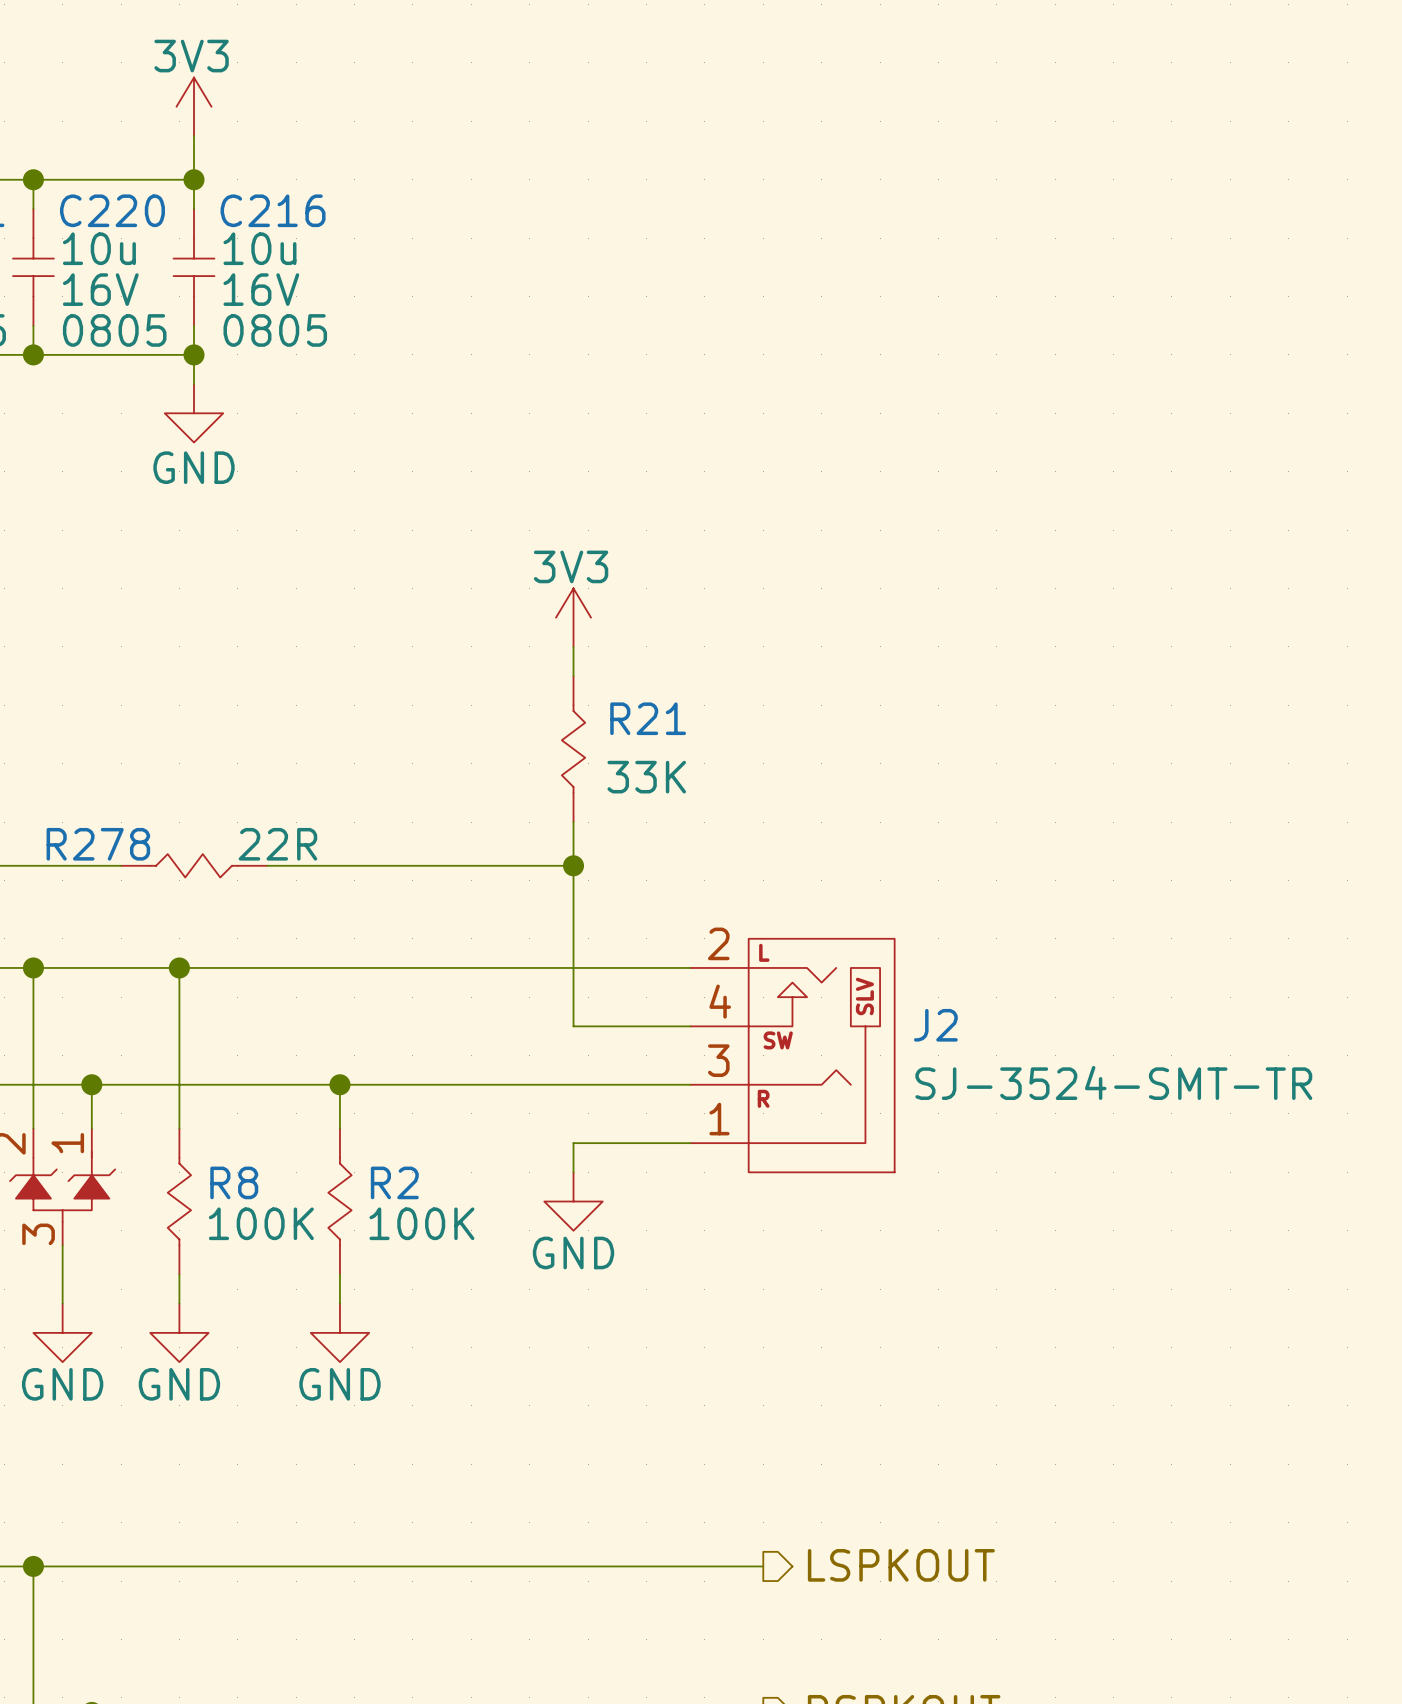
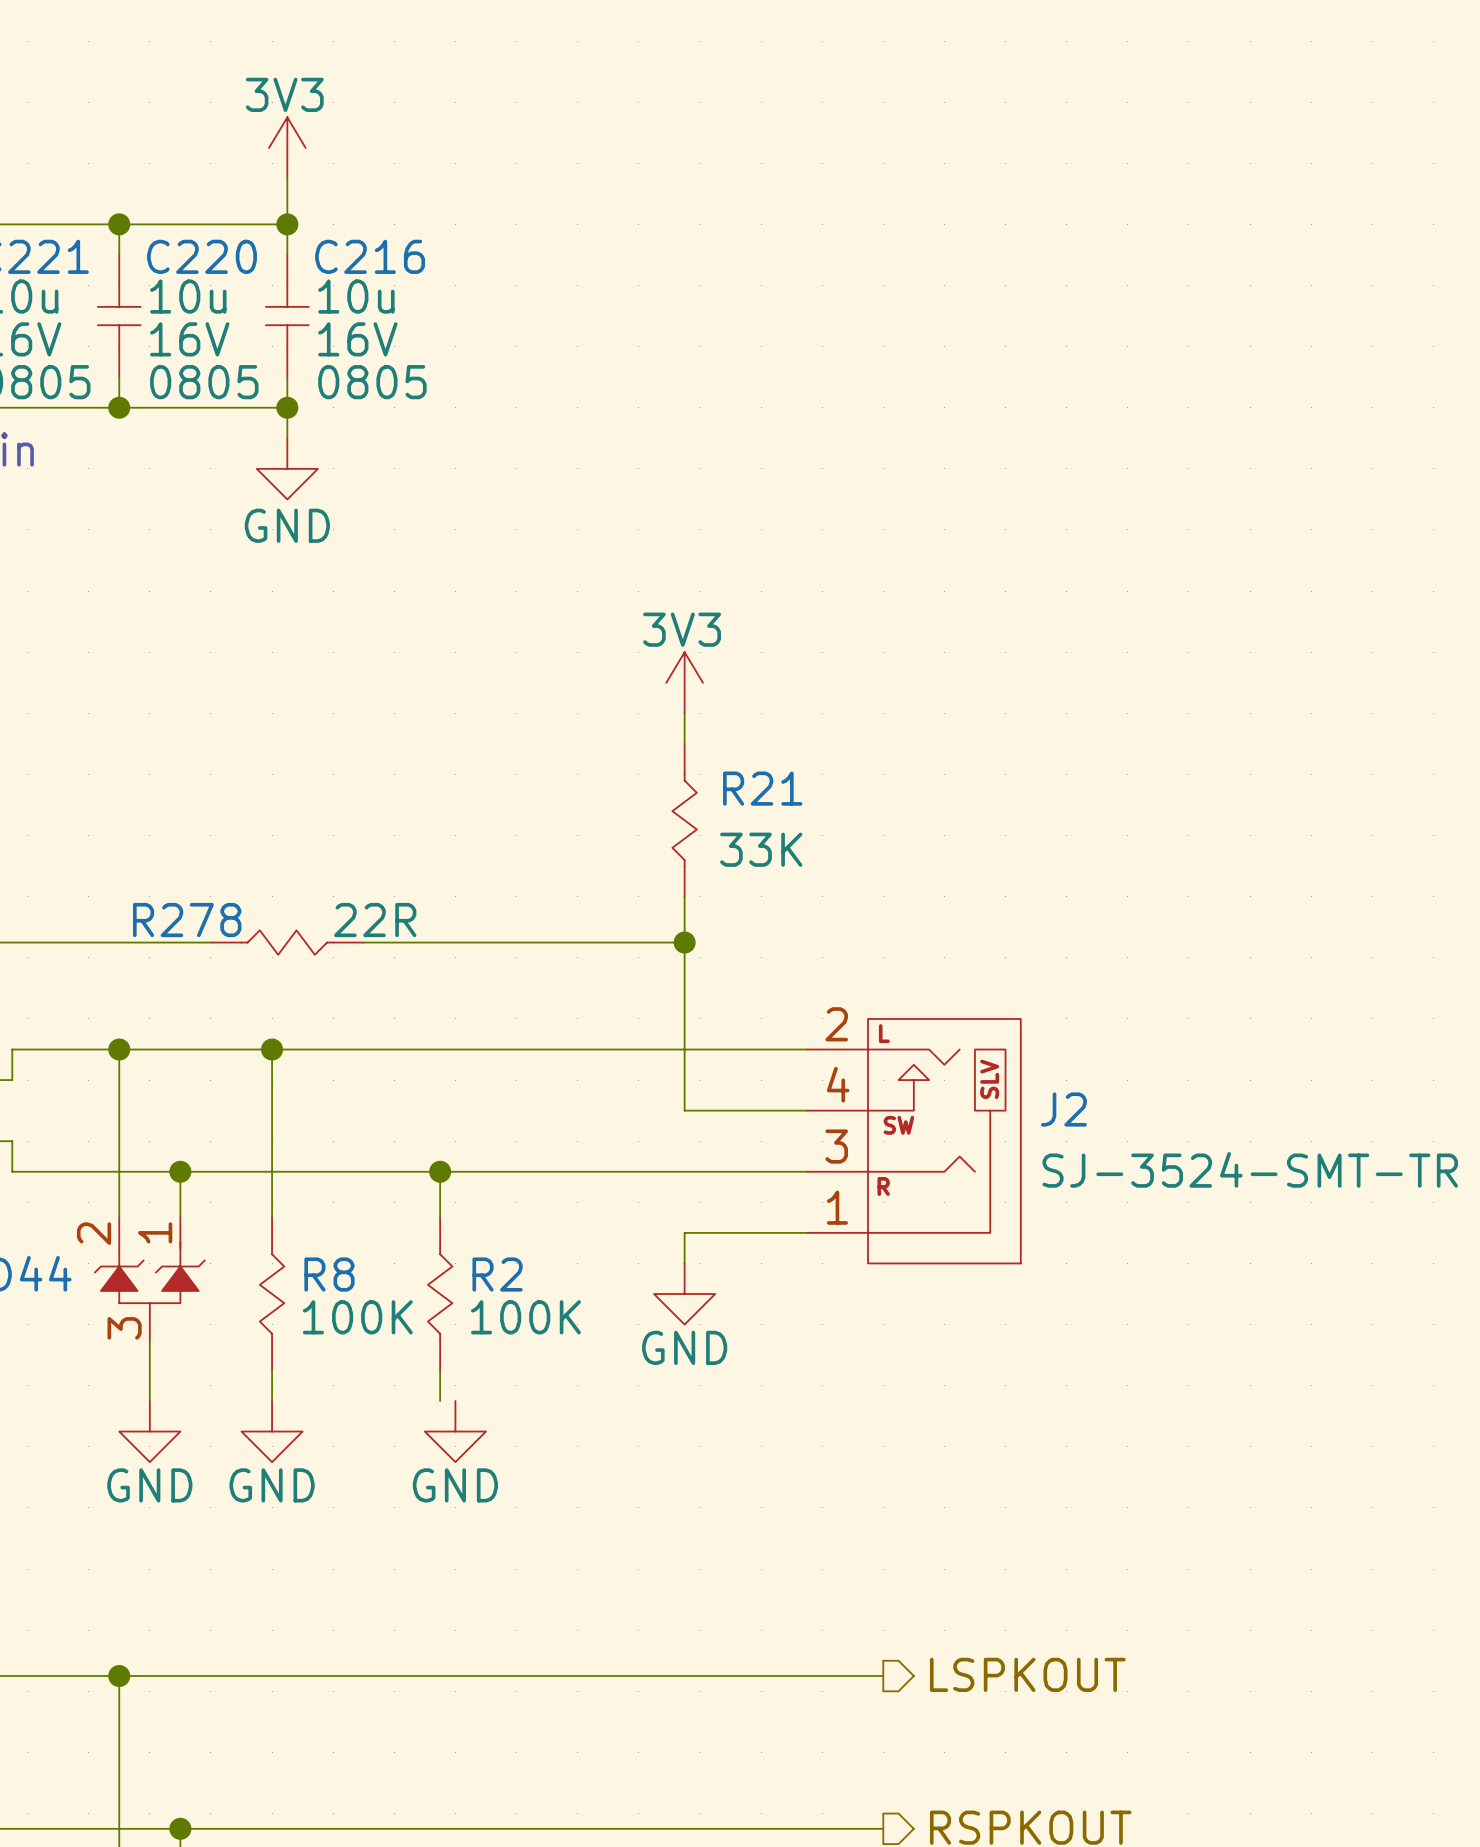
power symbol position: GND (339, 1332) -> GND (455, 1431)

